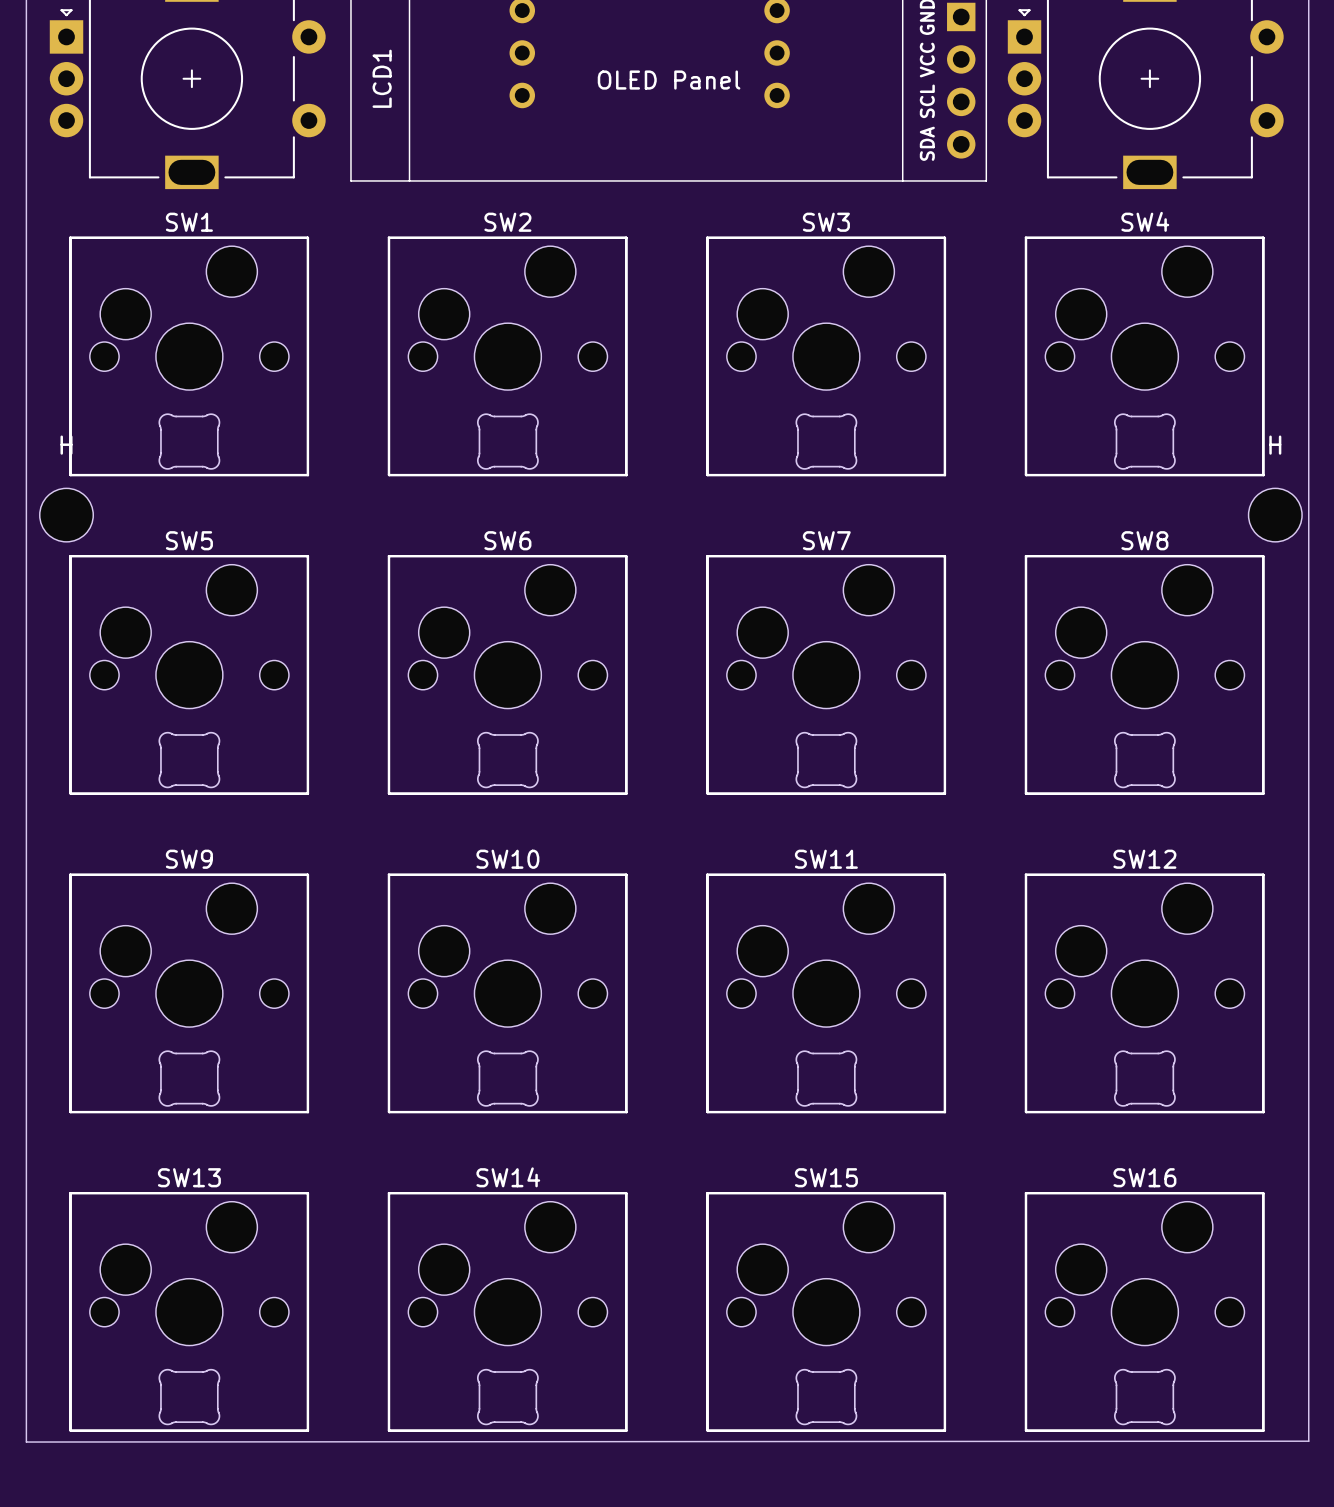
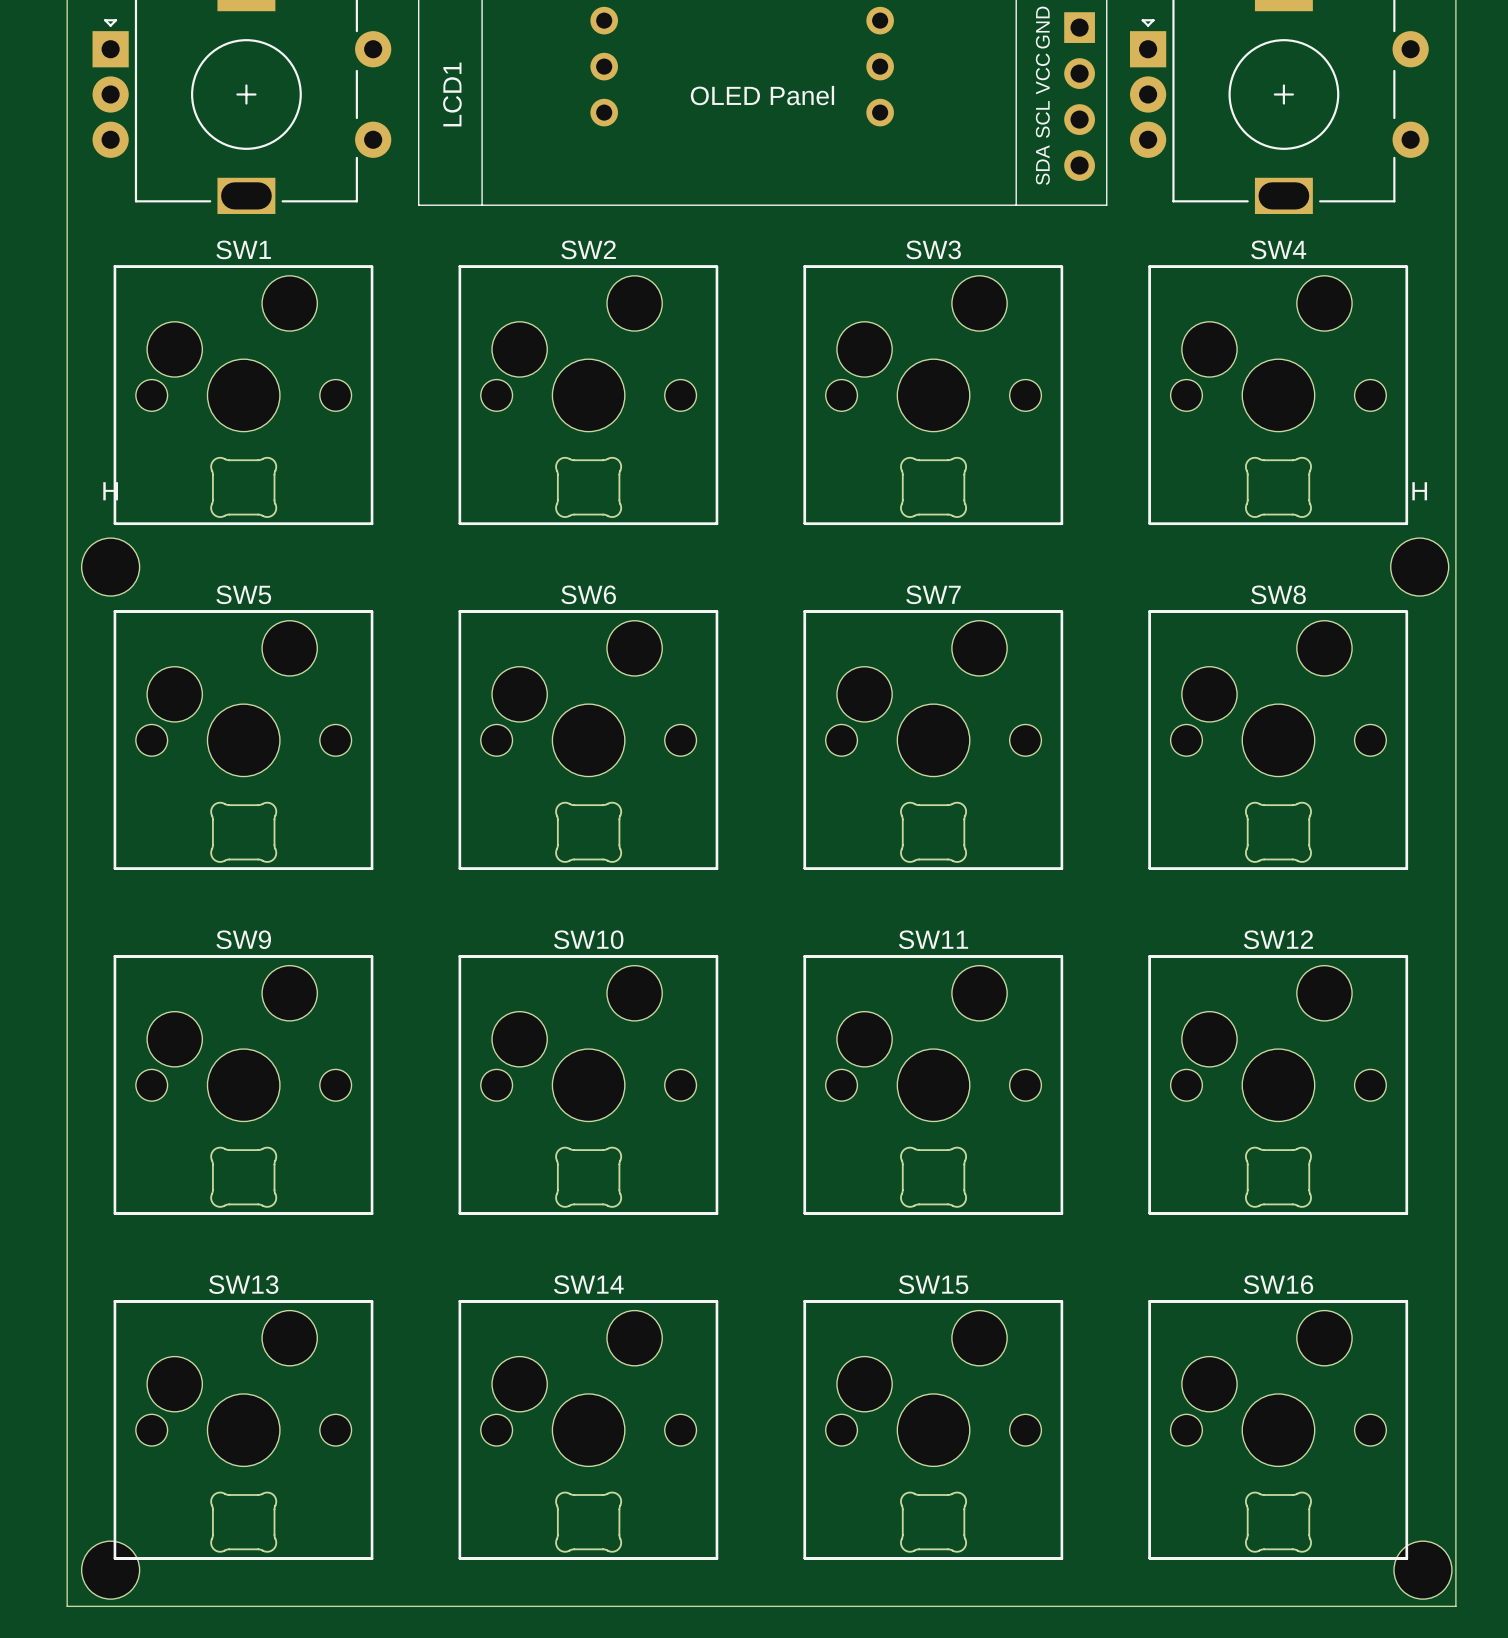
part: none -> (110, 1570)
part: none -> (1422, 1570)
board edge: (1308, 1441) (26, 1442) -> (1455, 1569) (1455, 1606) (67, 1606) (67, 1570)

